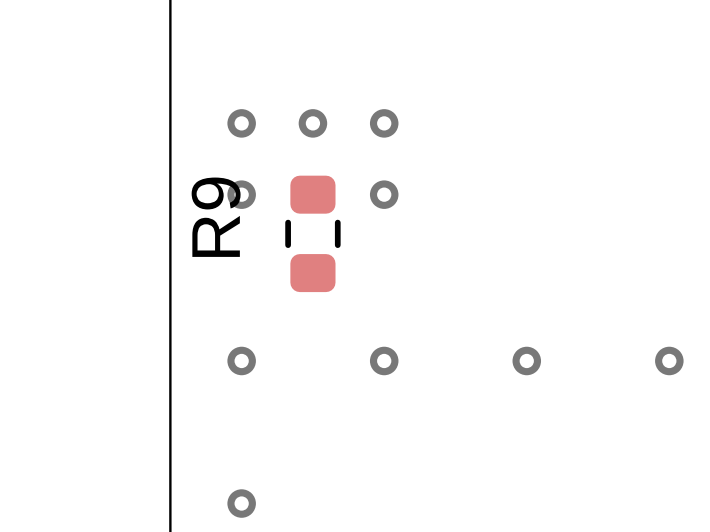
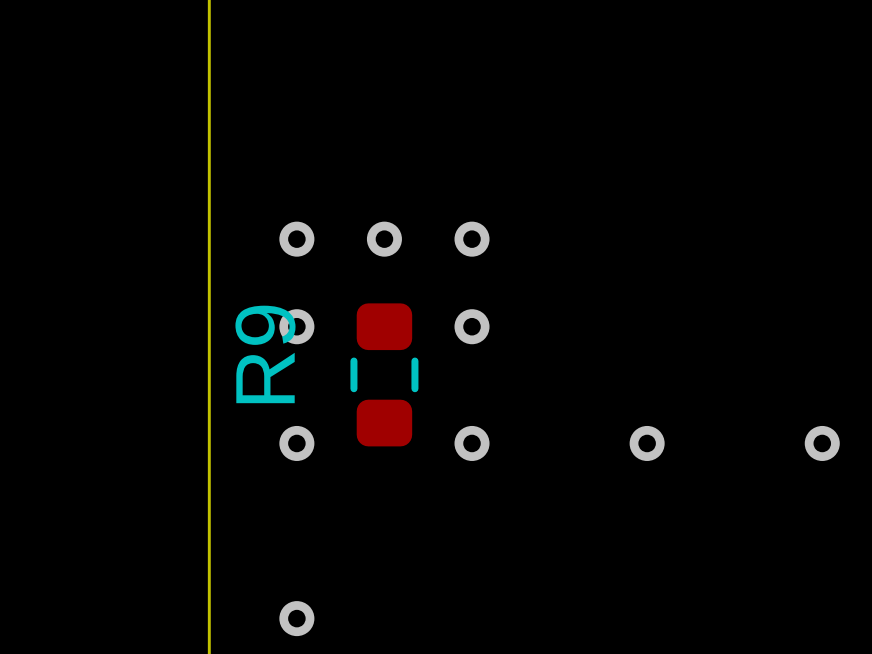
via: (241, 123) -> none
via: (312, 123) -> none
via: (384, 123) -> none
via: none -> (384, 239)
R9 position: (312, 233) -> (384, 374)
via: none -> (296, 326)
via: none -> (472, 326)

